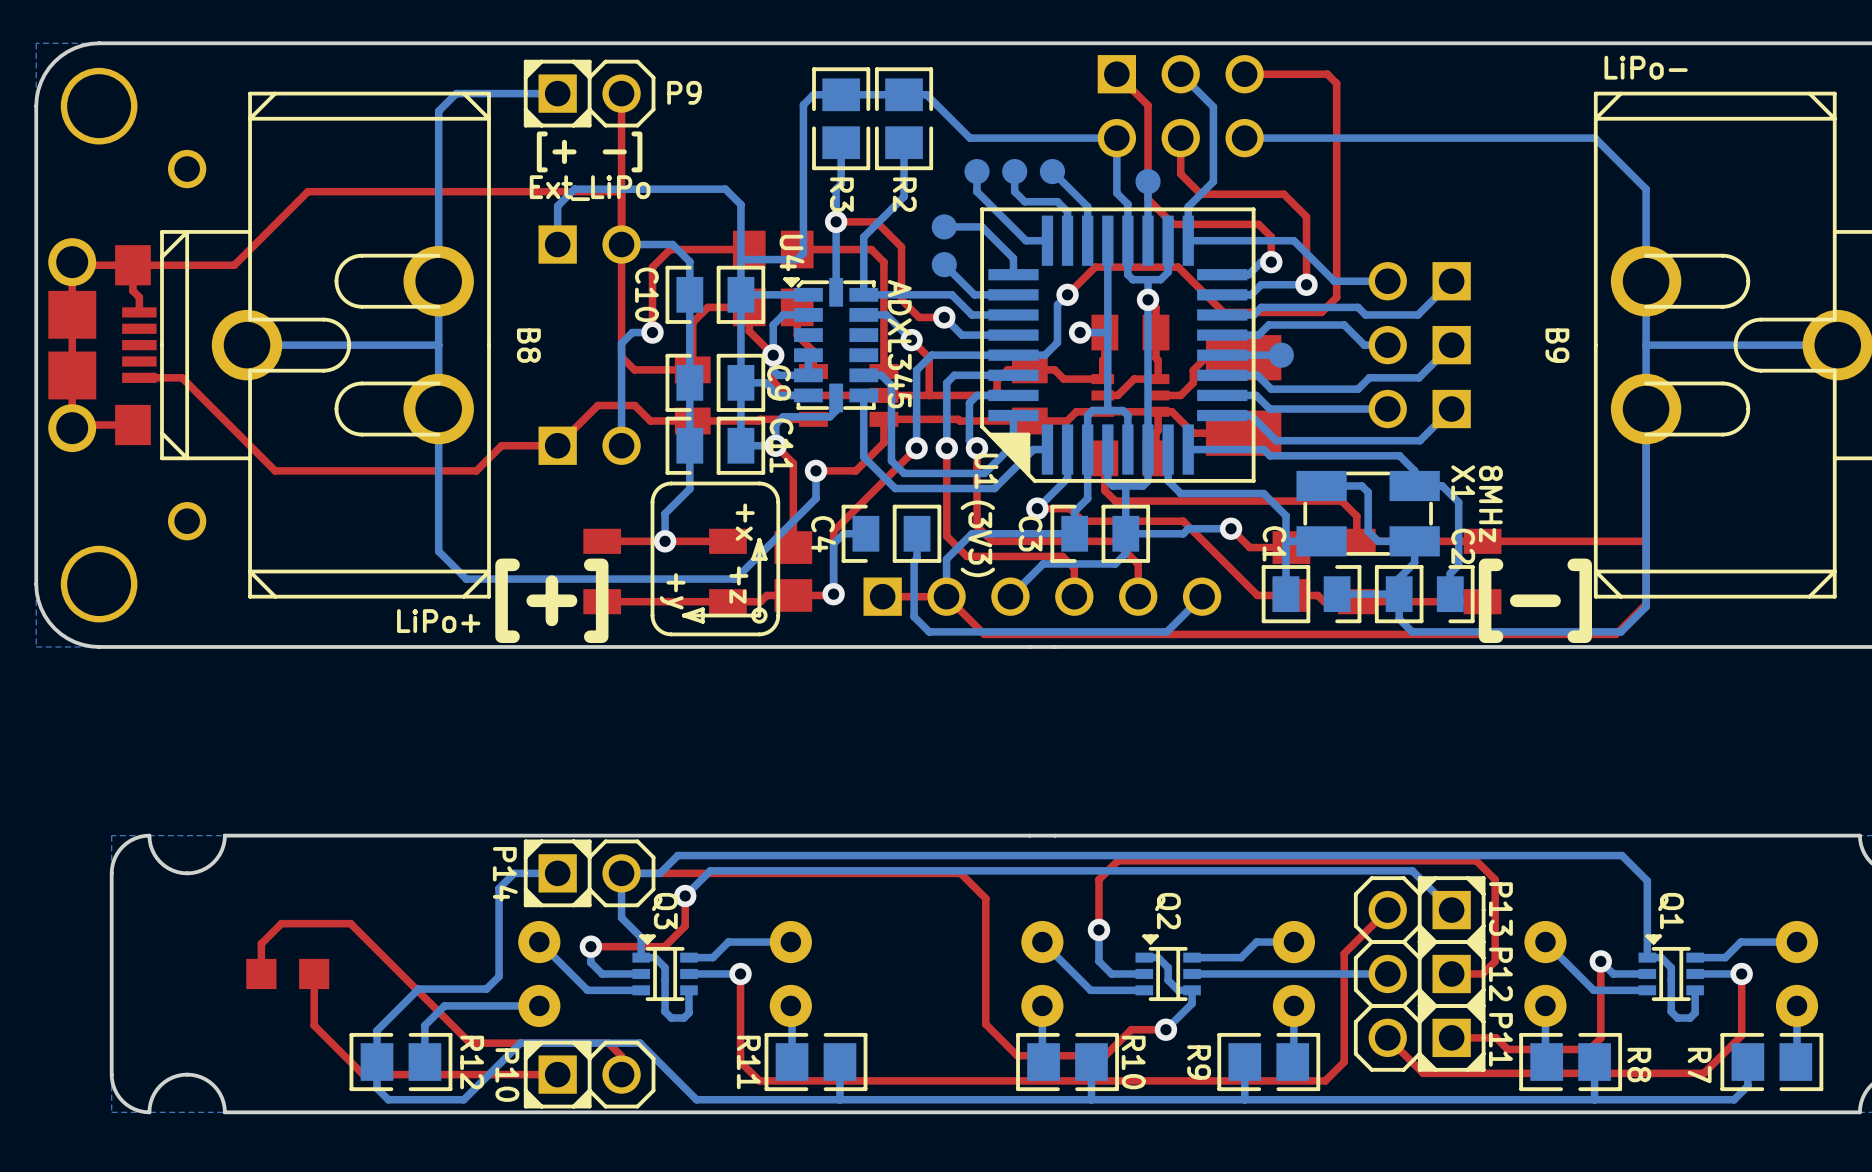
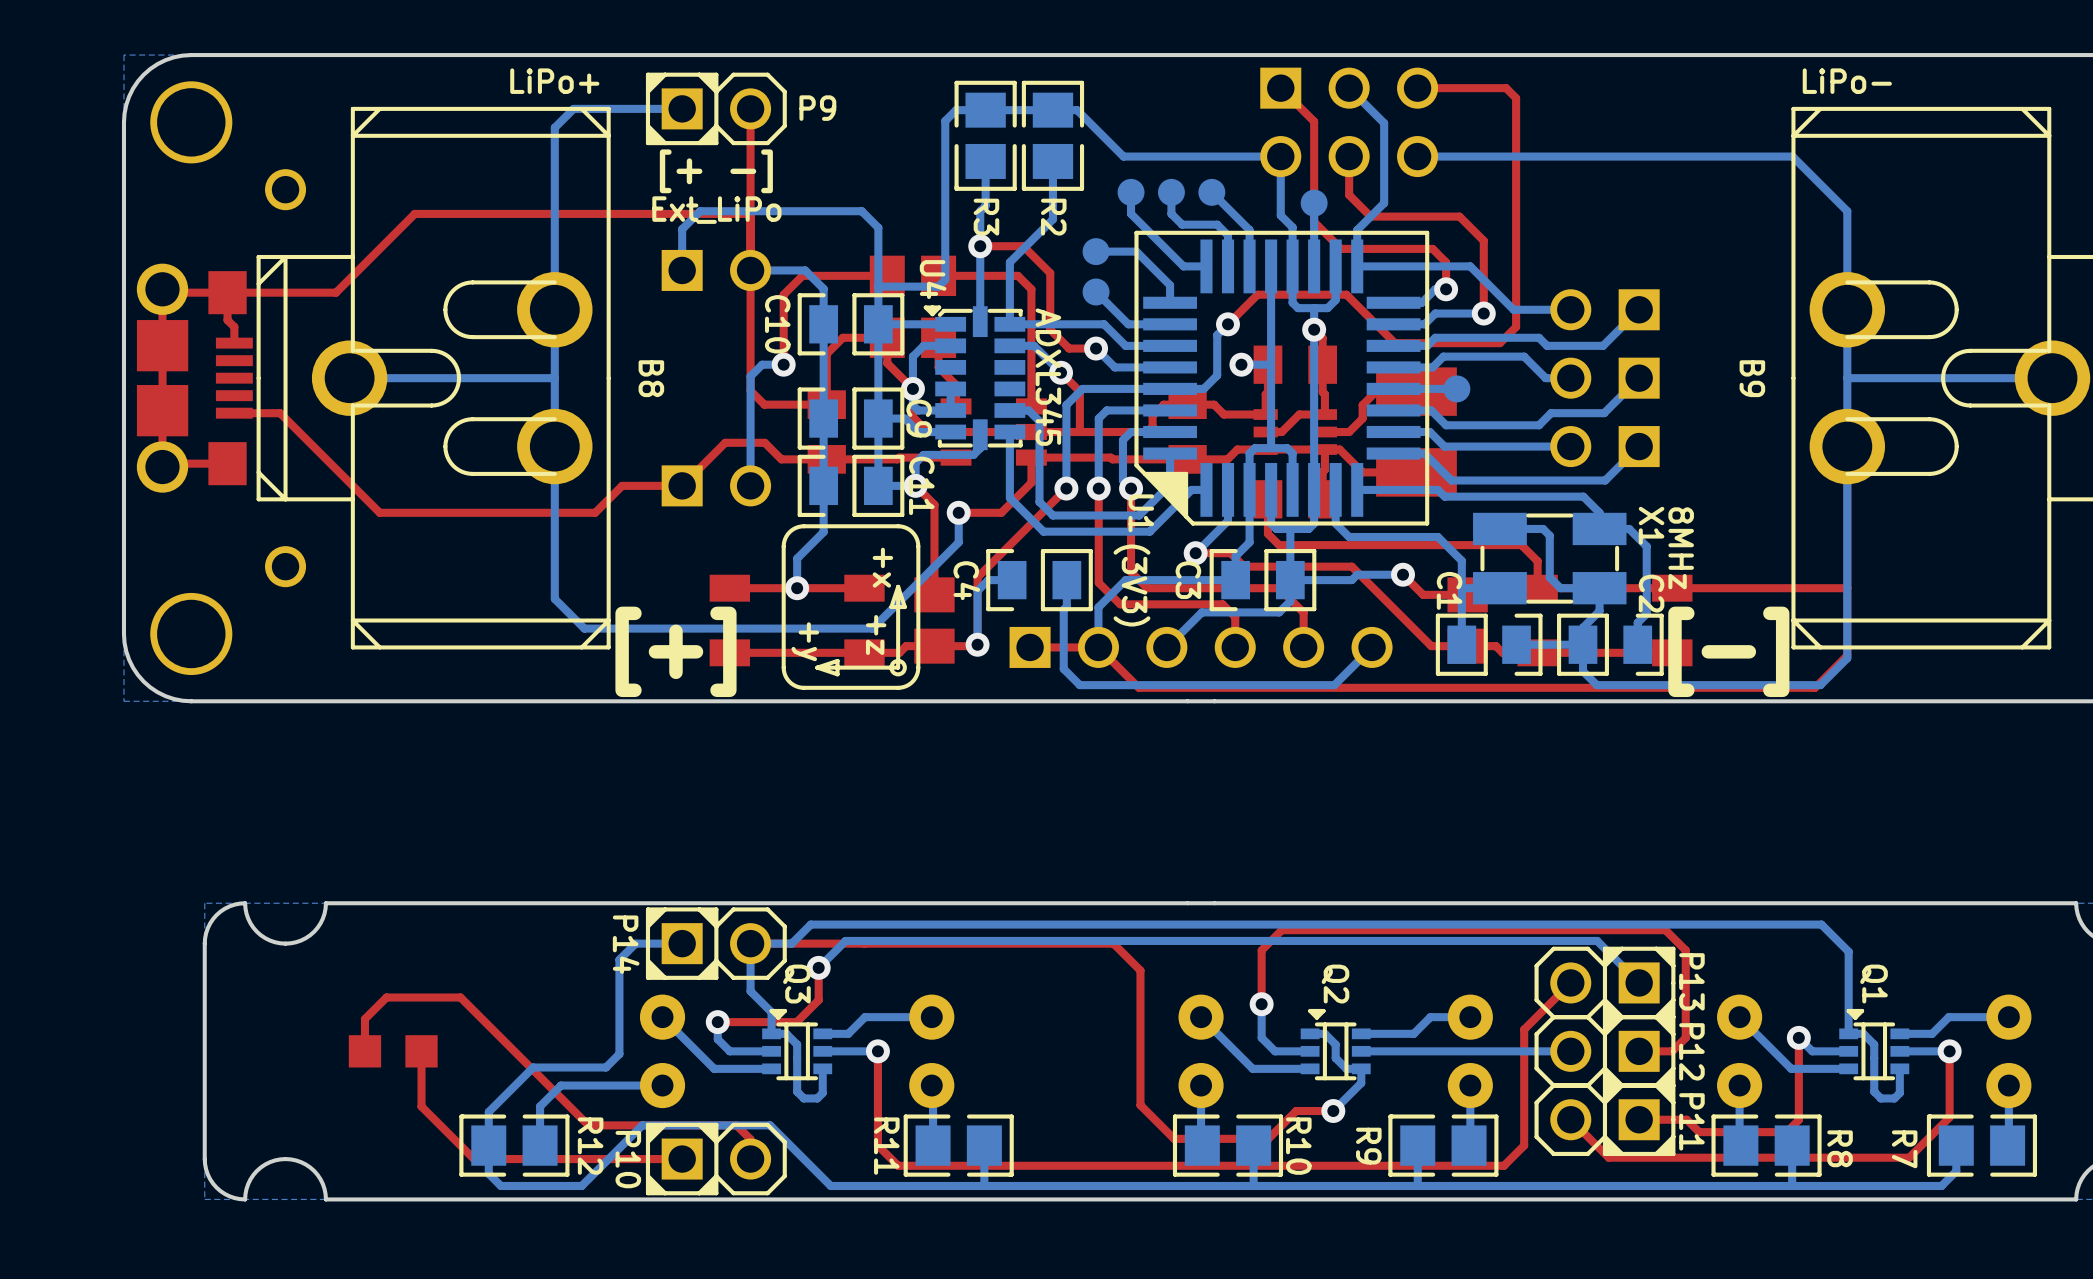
B8 value position: LiPo+ (438, 621) -> LiPo+ (554, 81)

